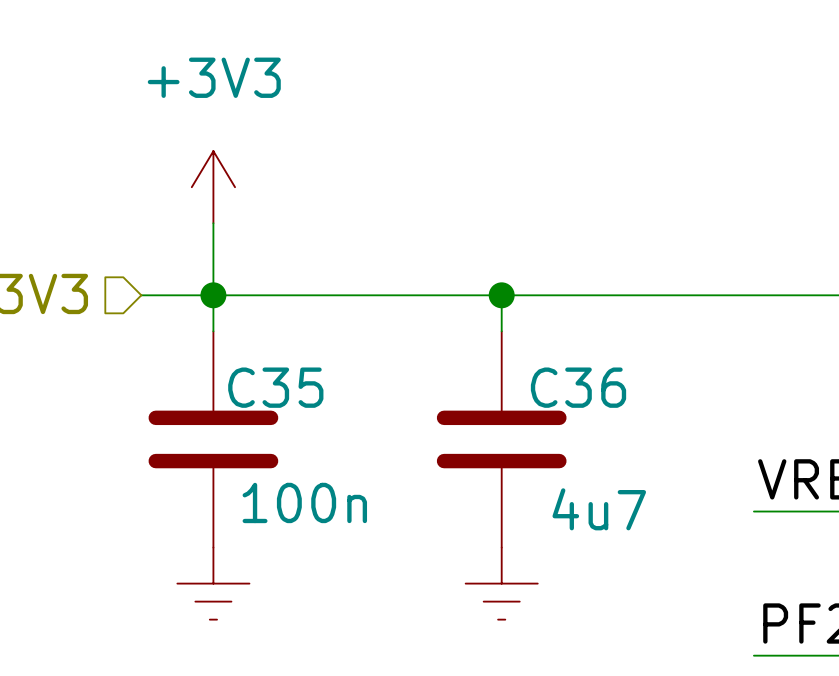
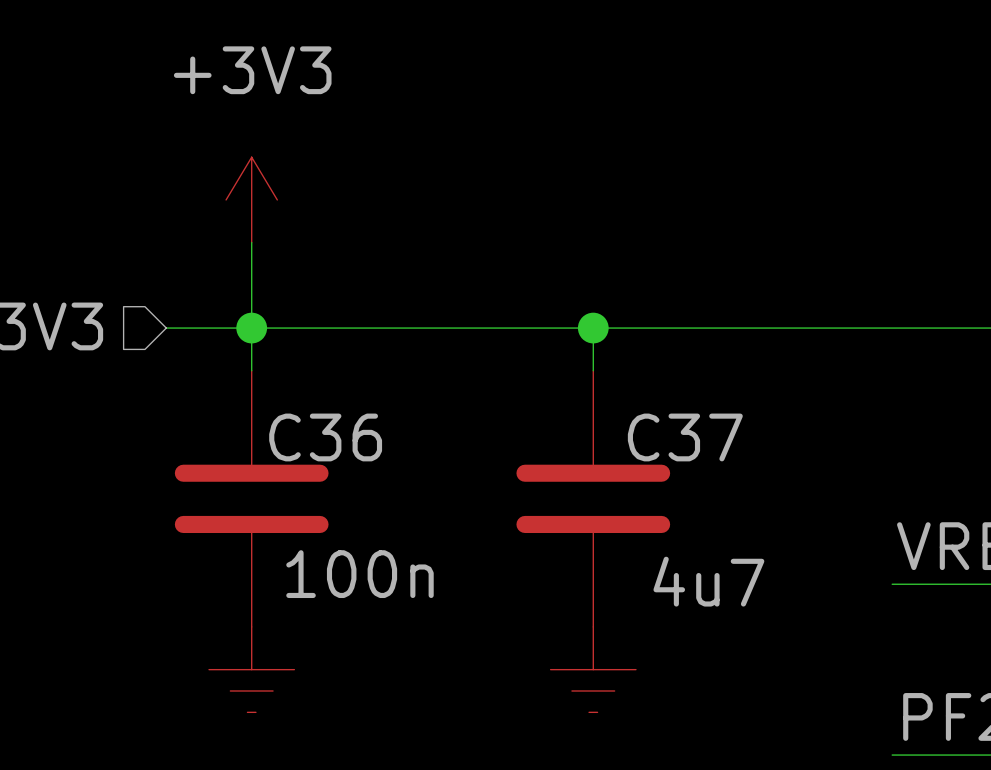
C35 name: C35 (275, 387) -> C36 (325, 437)
C36 name: C36 (578, 387) -> C37 (685, 437)

